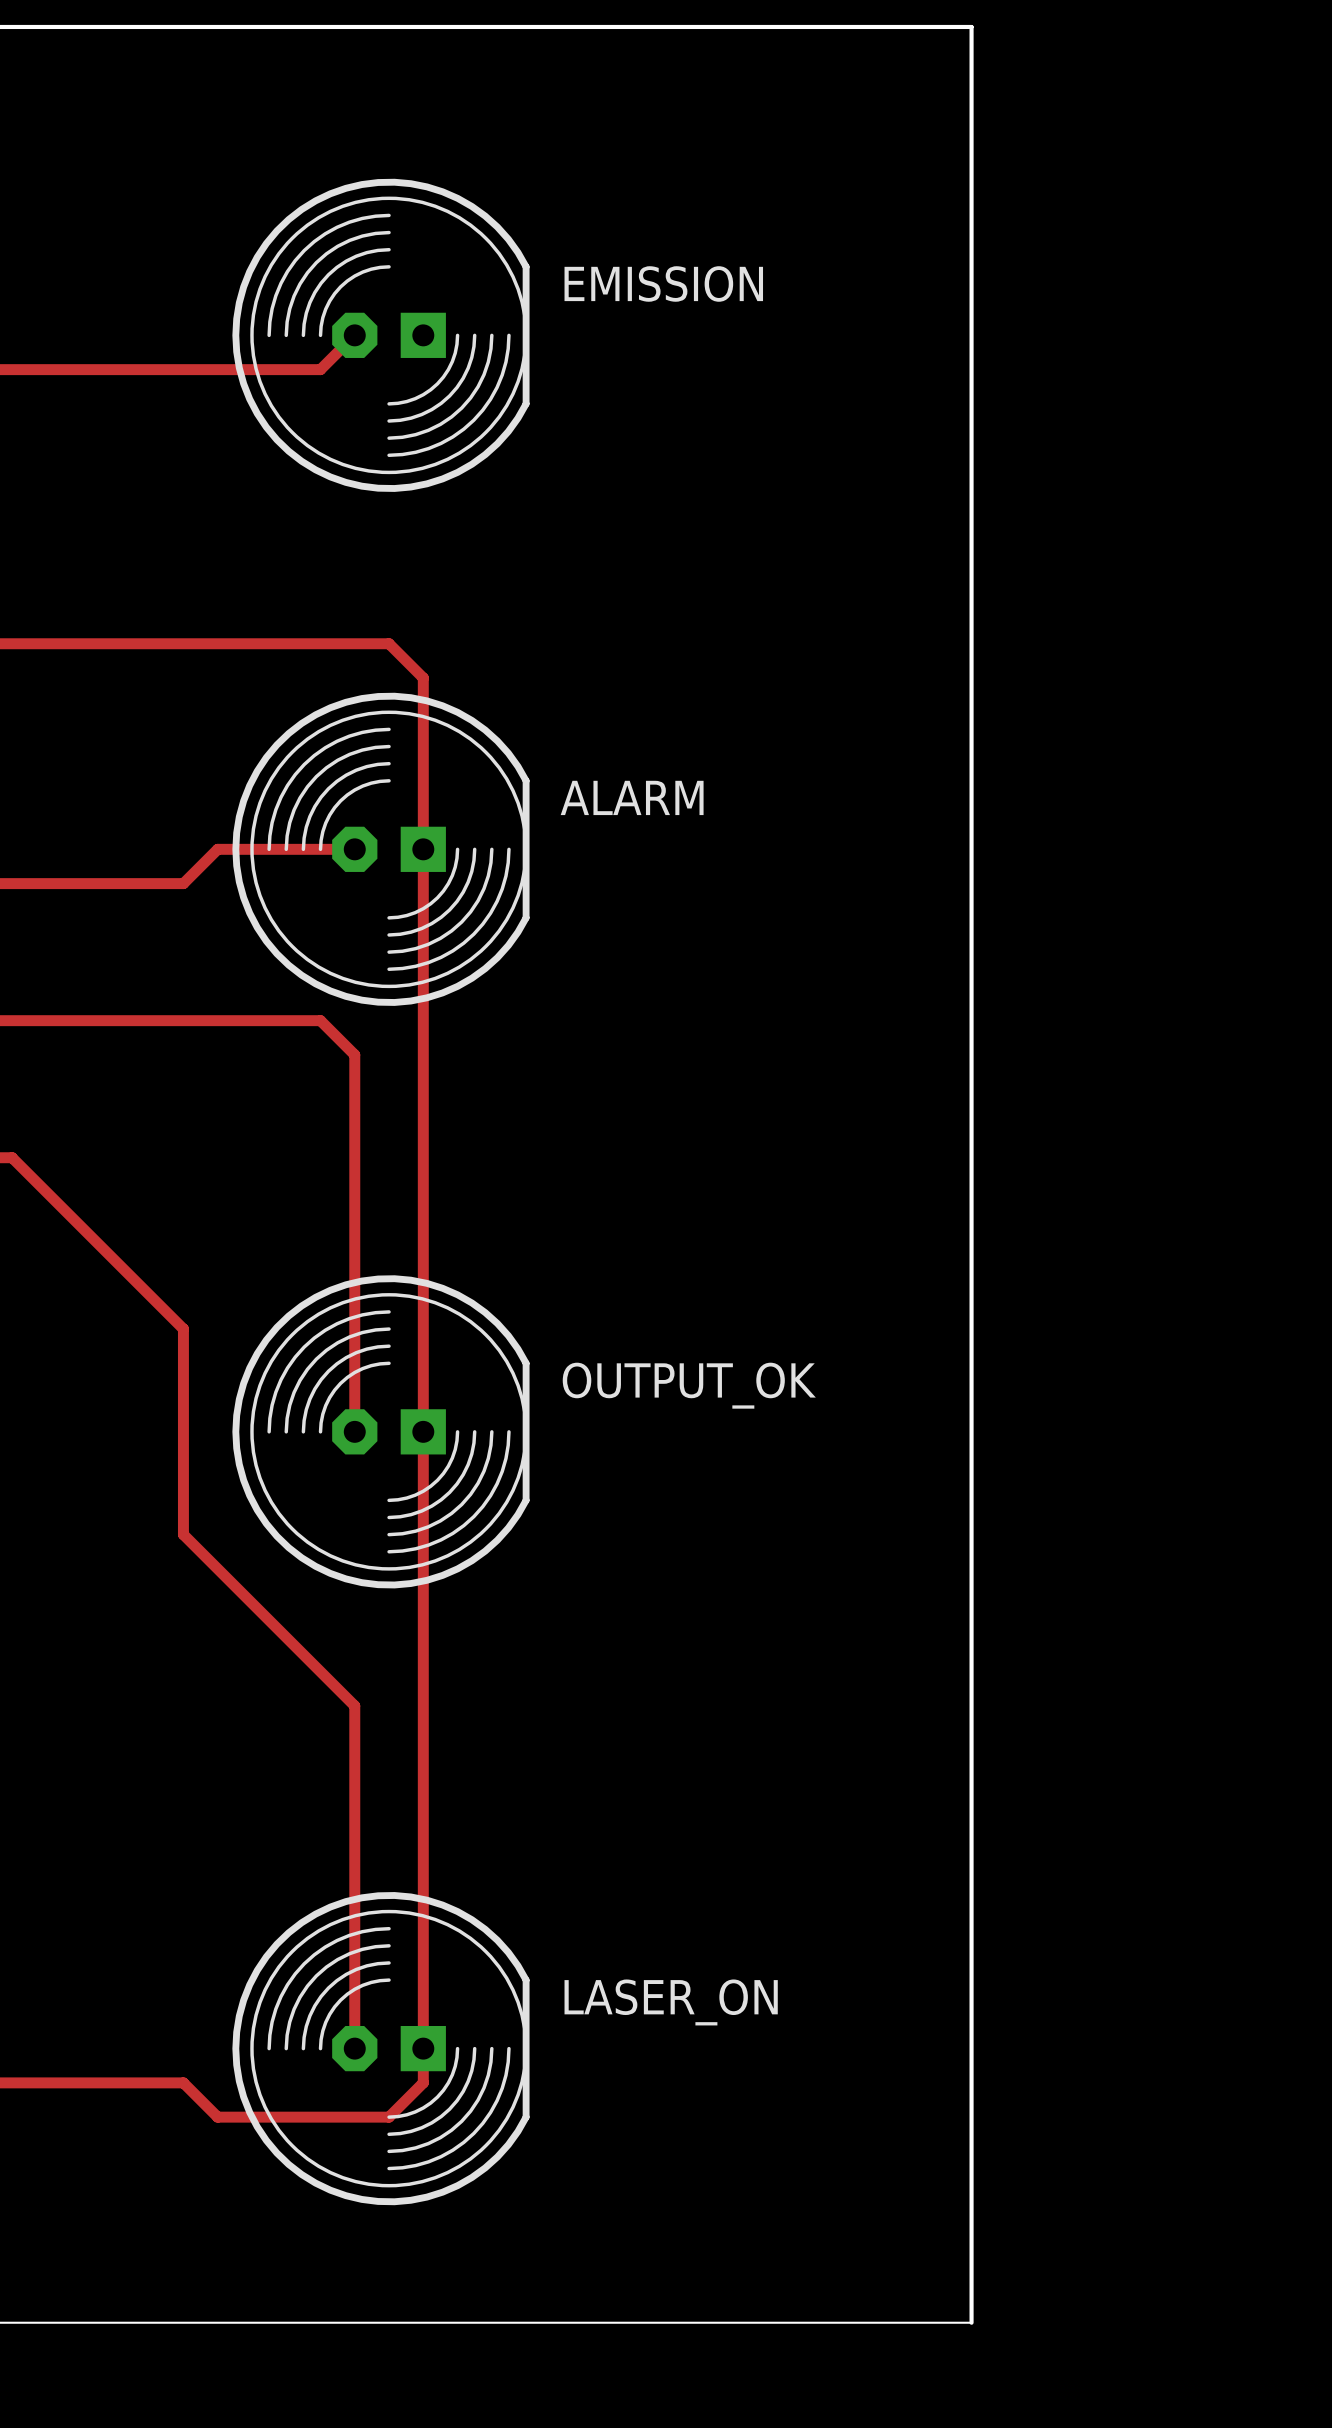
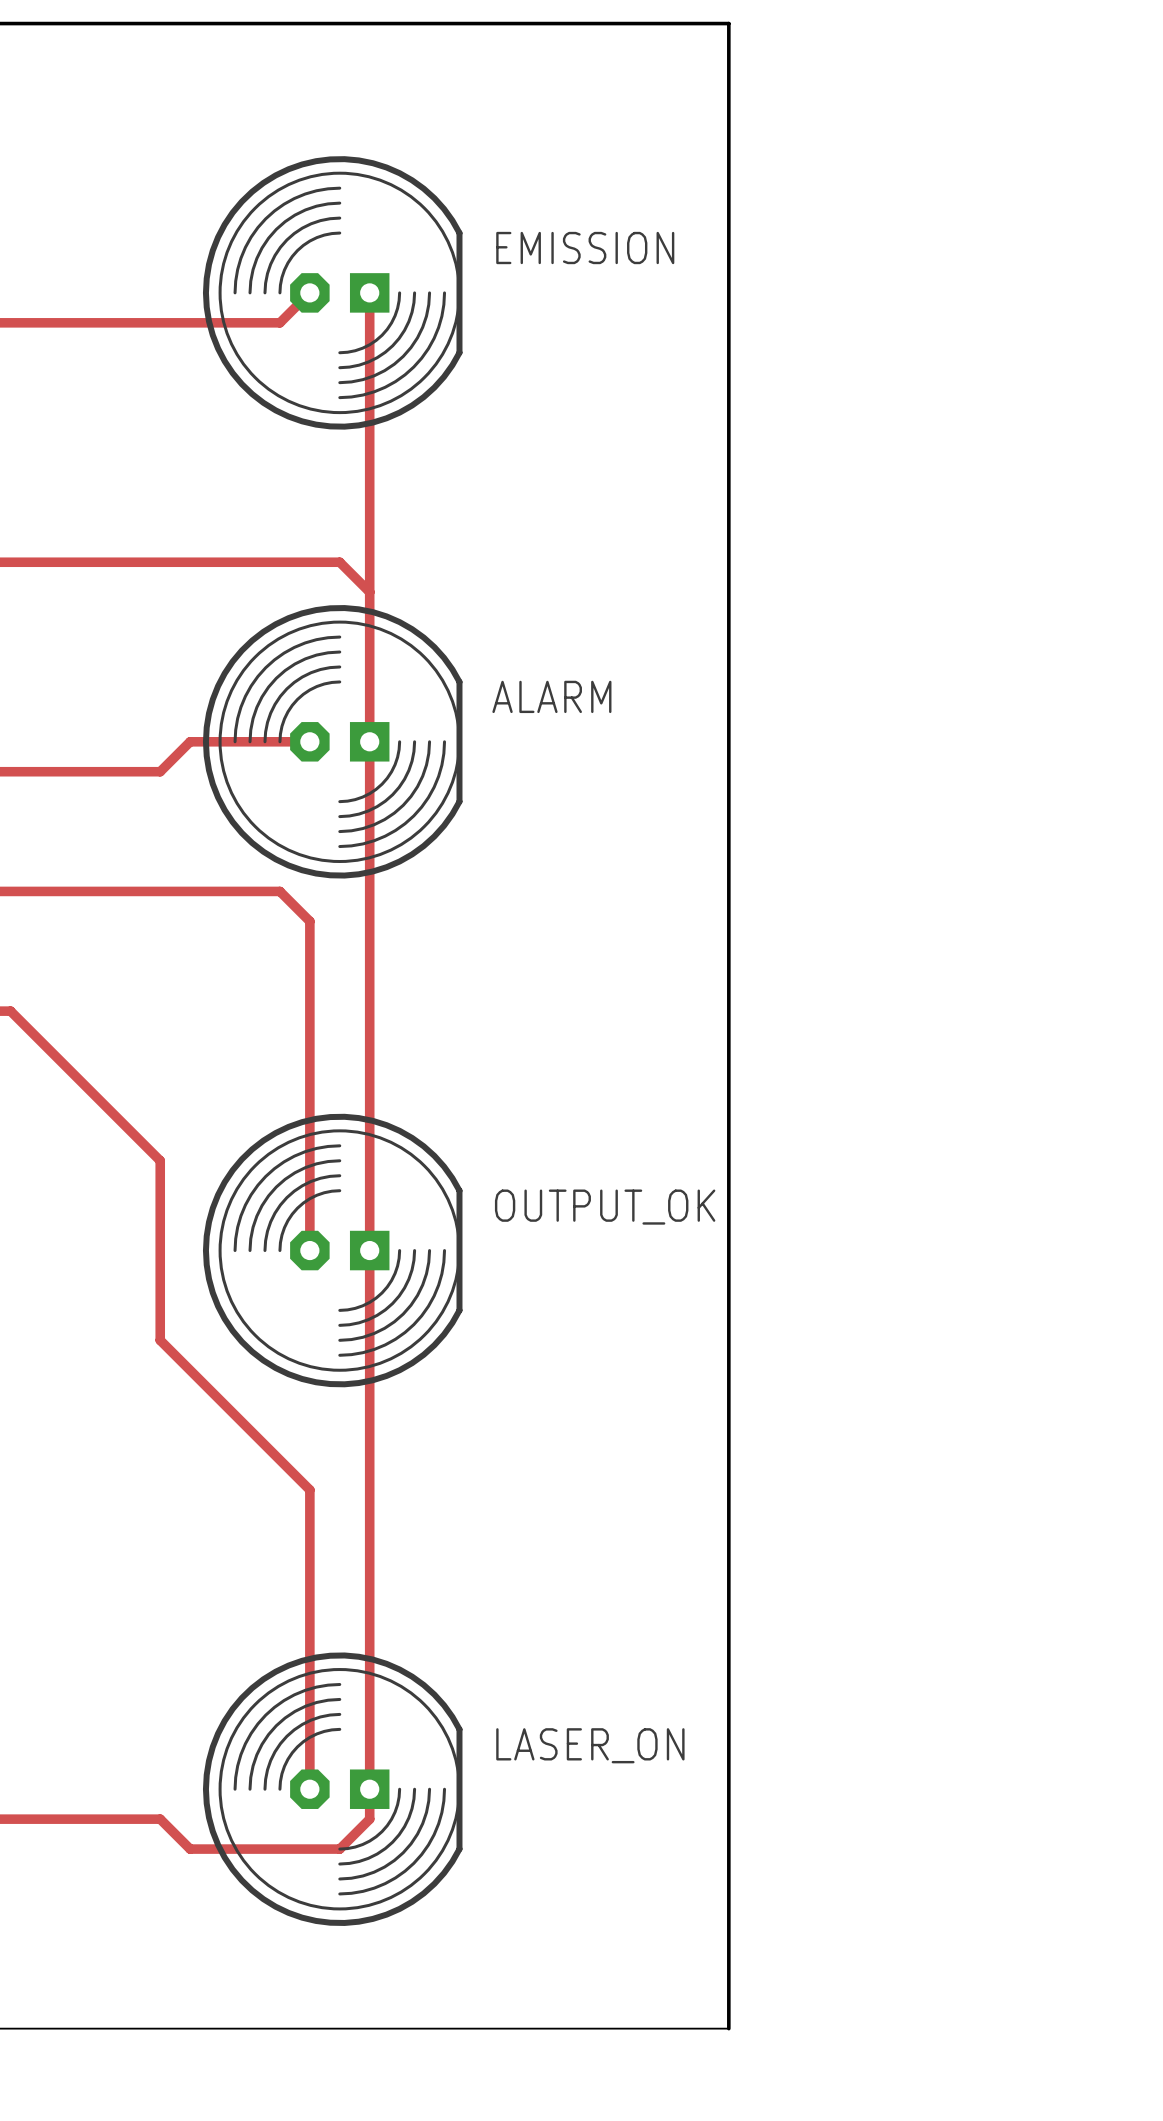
board edge: (834, 26) (971, 26) (971, 2322) (834, 2322) -> (728, 23) (728, 2028)
top track: none -> (369, 292) (369, 592)

